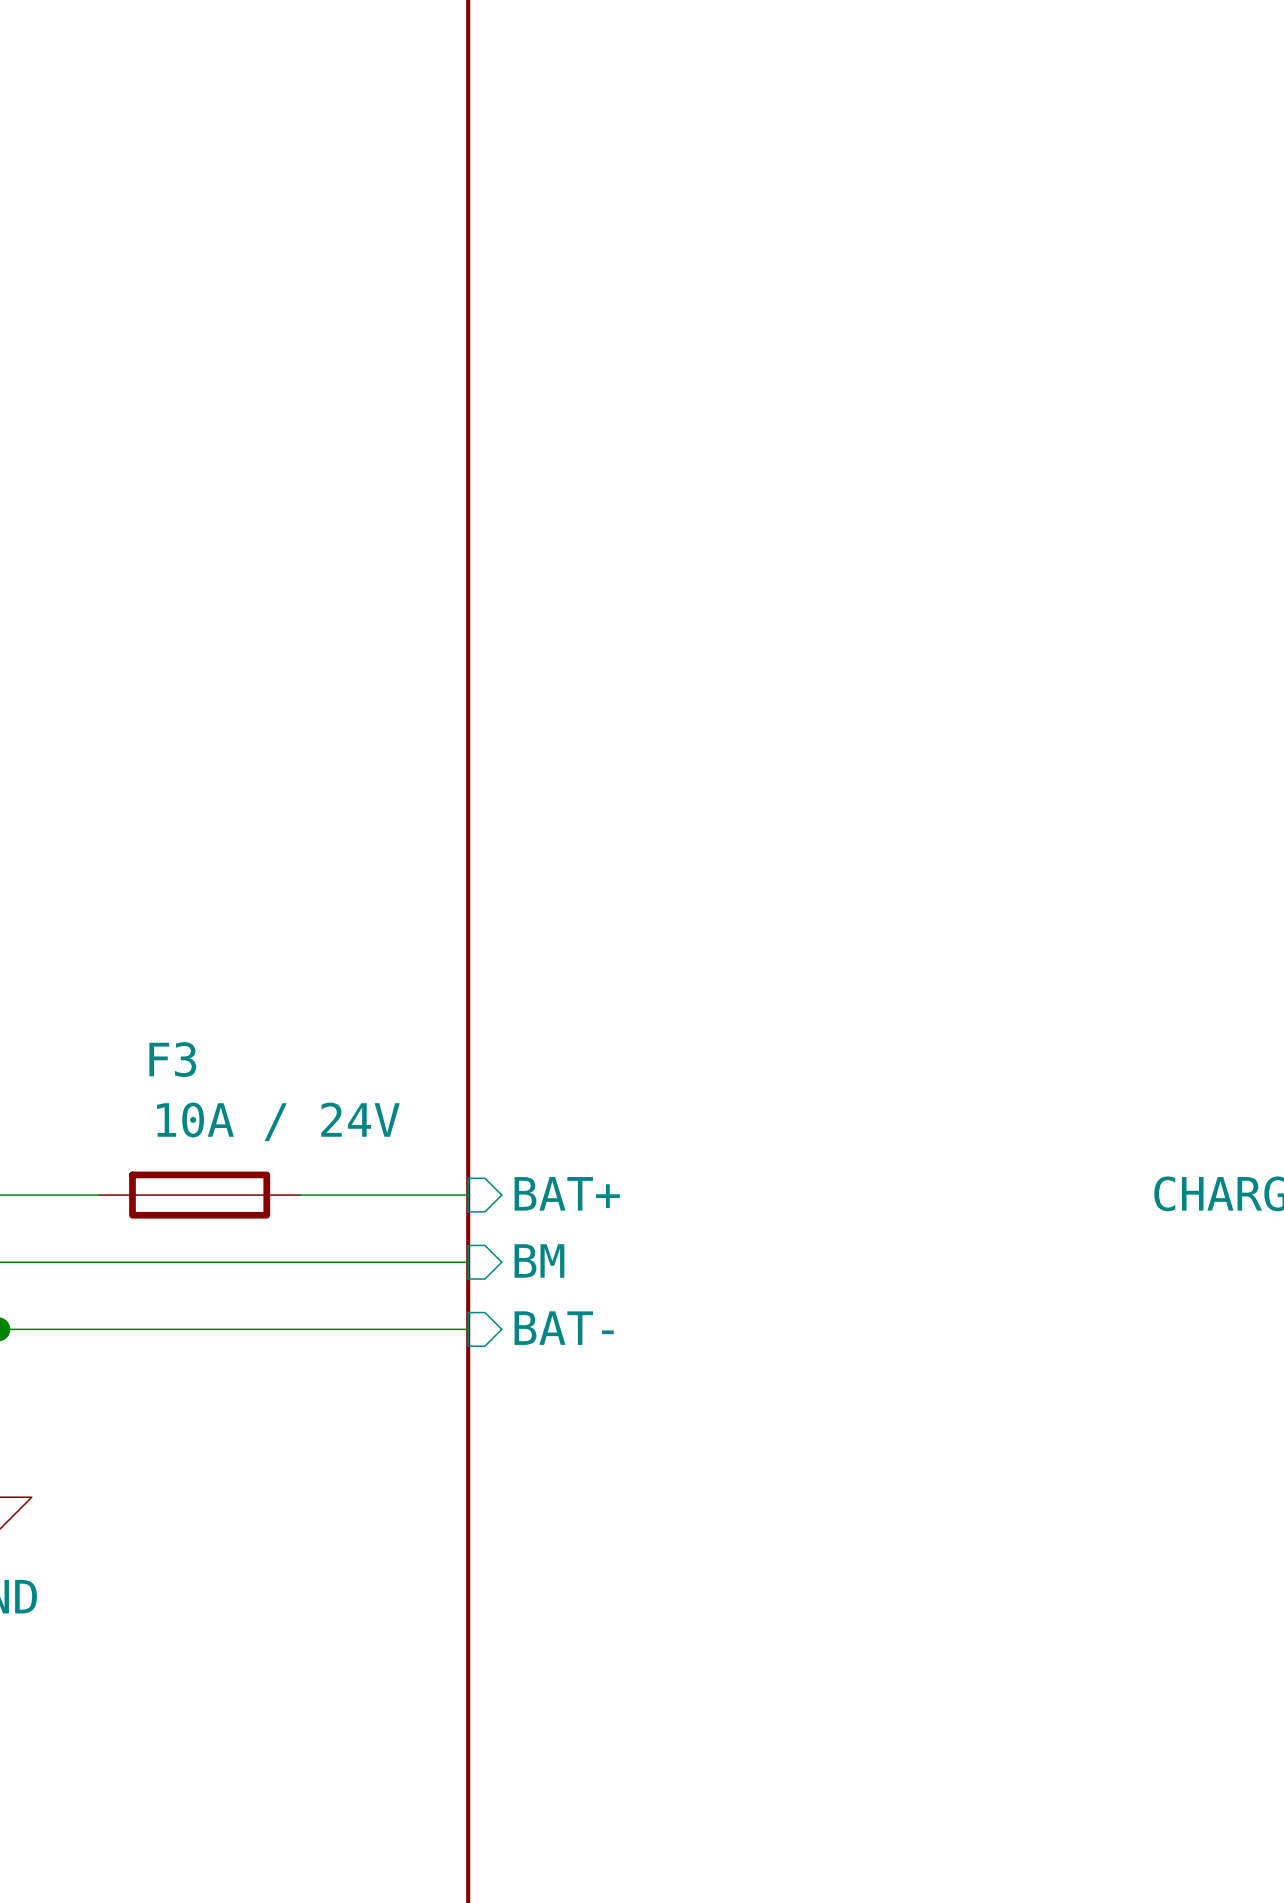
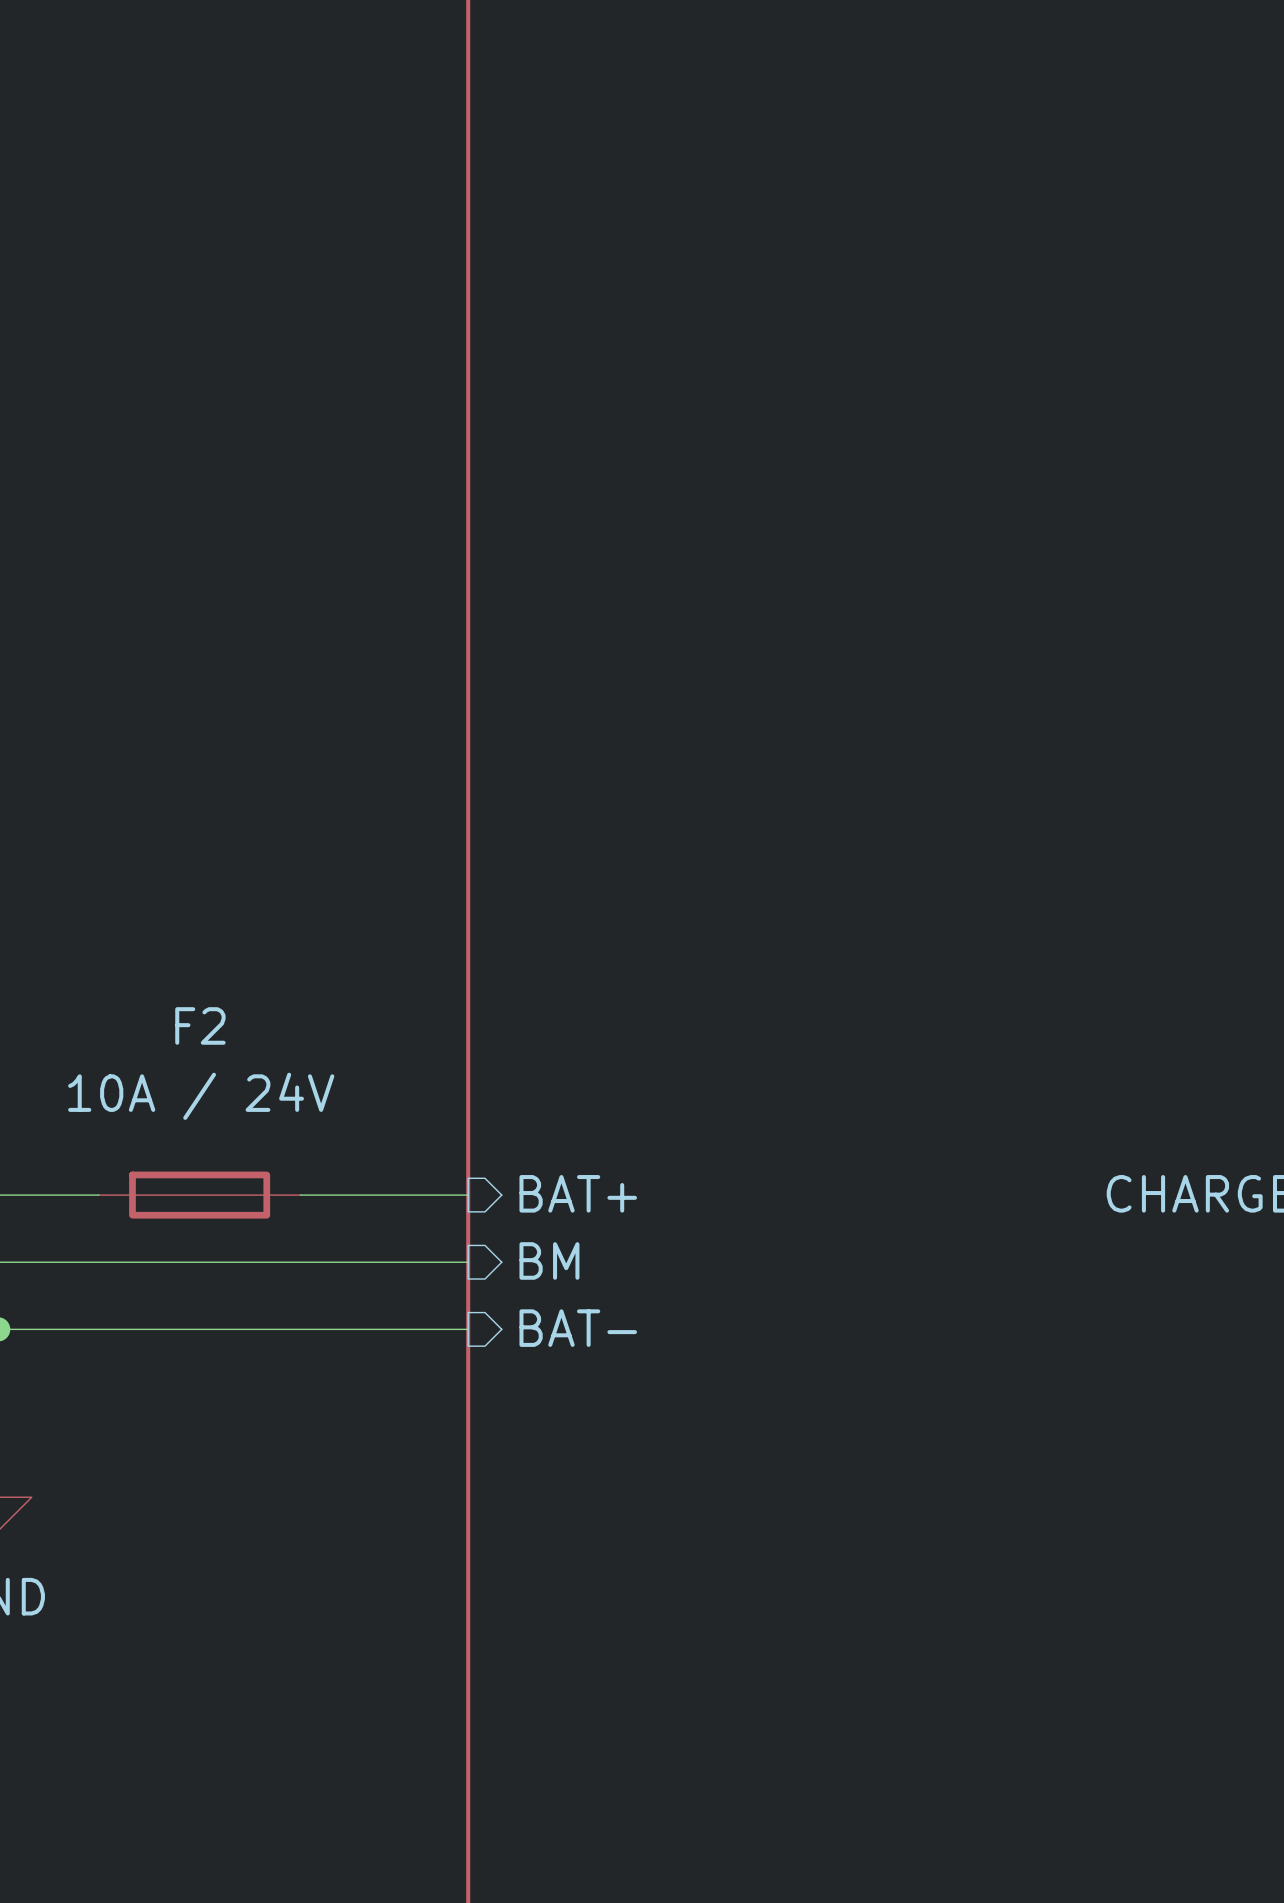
F3 name: F3 (172, 1059) -> F2 (200, 1025)
F3 value position: 10A / 24V (278, 1121) -> 10A / 24V (201, 1096)

